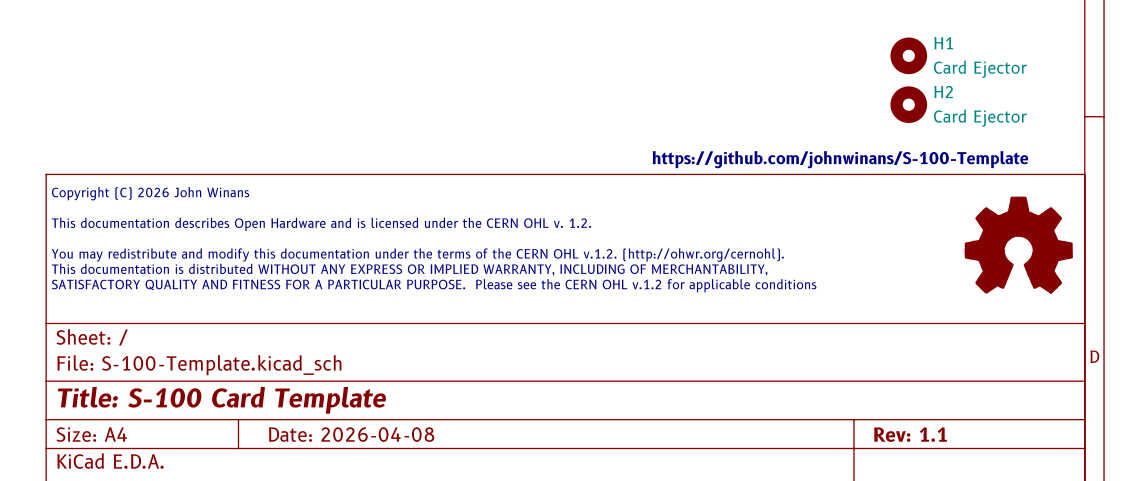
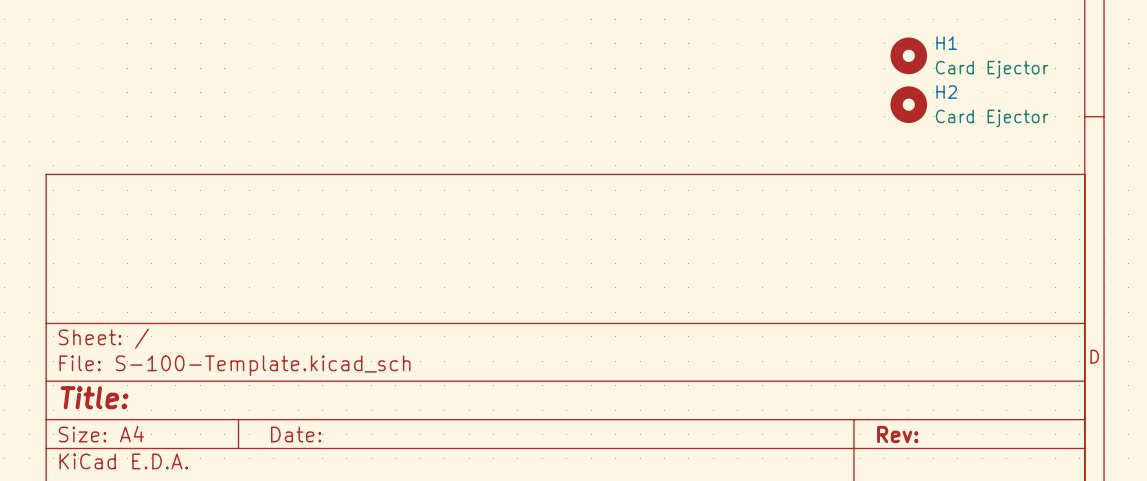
text: https://github.com/johnwinans/S-100-Template (840, 159) -> none
text: Copyright (C) 2026 John Winans (150, 193) -> none
text: This documentation describes Open Hardware and is licensed under the CERN OHL v. 1.2. (321, 224) -> none
part: (1018, 245) -> none
text: You may redistribute and modify this documentation under the terms of the CERN OHL v.1.2. (http://ohwr.org/cernohl). (417, 255) -> none
text: This documentation is distributed WITHOUT ANY EXPRESS OR IMPLIED WARRANTY, INCLUDING OF MERCHANTABILITY, (409, 269) -> none
text: SATISFACTORY QUALITY AND FITNESS FOR A PARTICULAR PURPOSE. Please see the CERN OHL v.1.2 for applicable conditions (434, 285) -> none
title block: Title: S-100 Card Template (221, 400) -> Title: (94, 397)
title block: Date: 2026-04-08 (351, 434) -> Date: (296, 434)
title block: Rev: 1.1 (910, 434) -> Rev: (897, 434)

